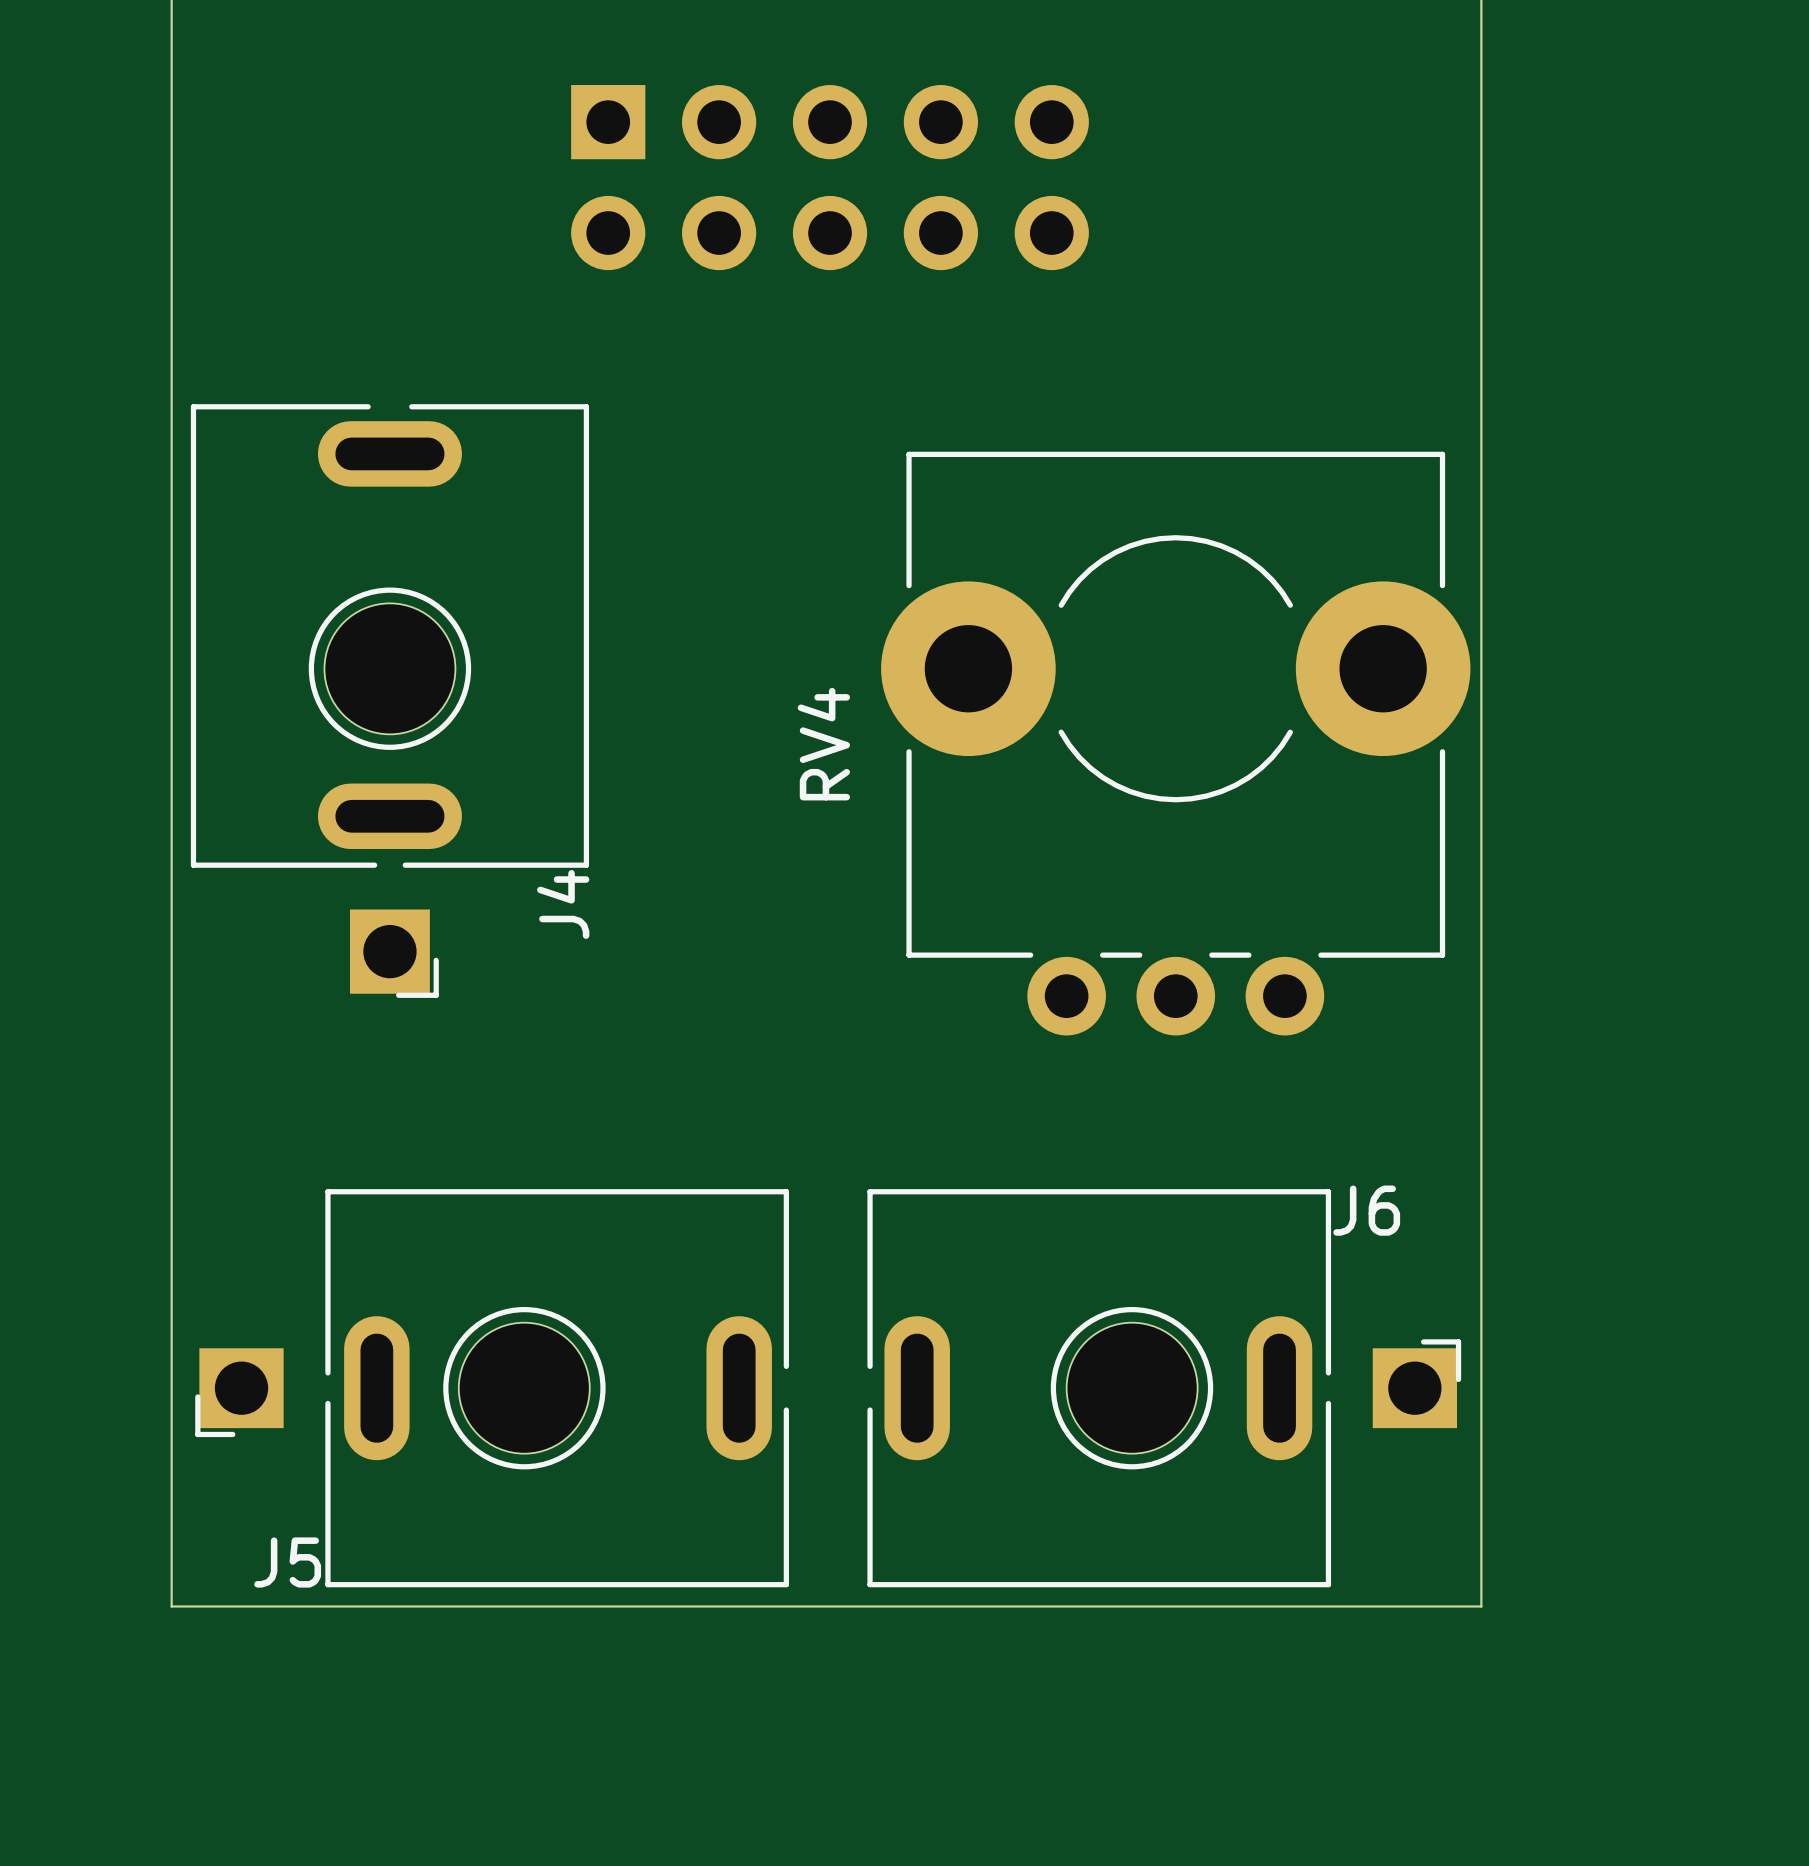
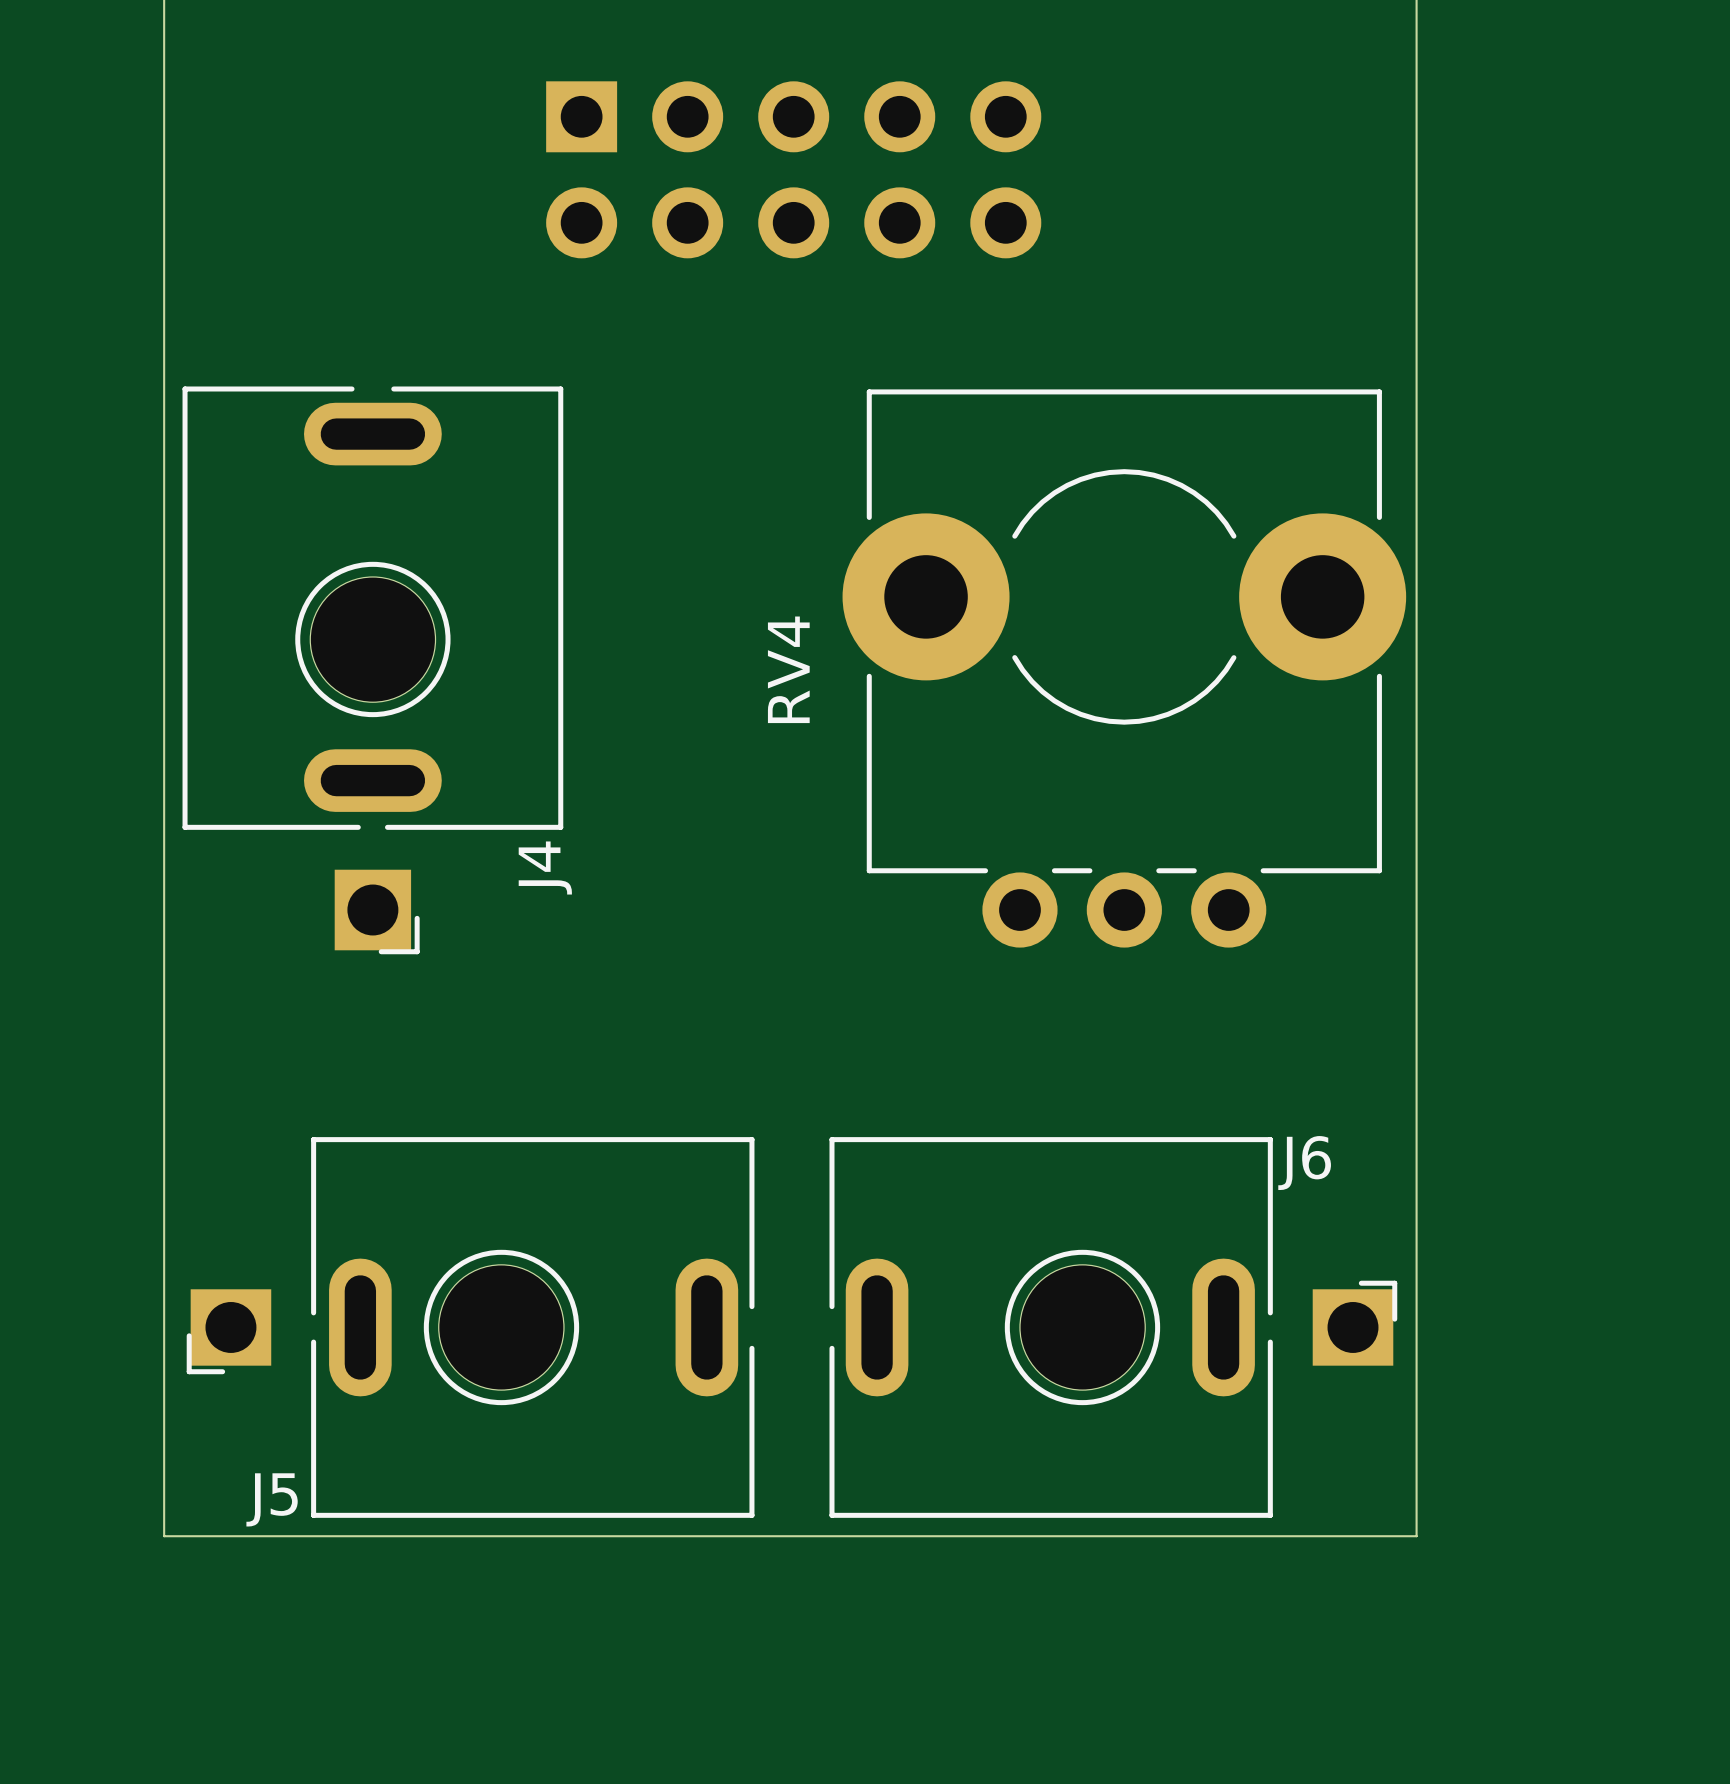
RV4 position: (1175, 743) -> (1124, 668)

